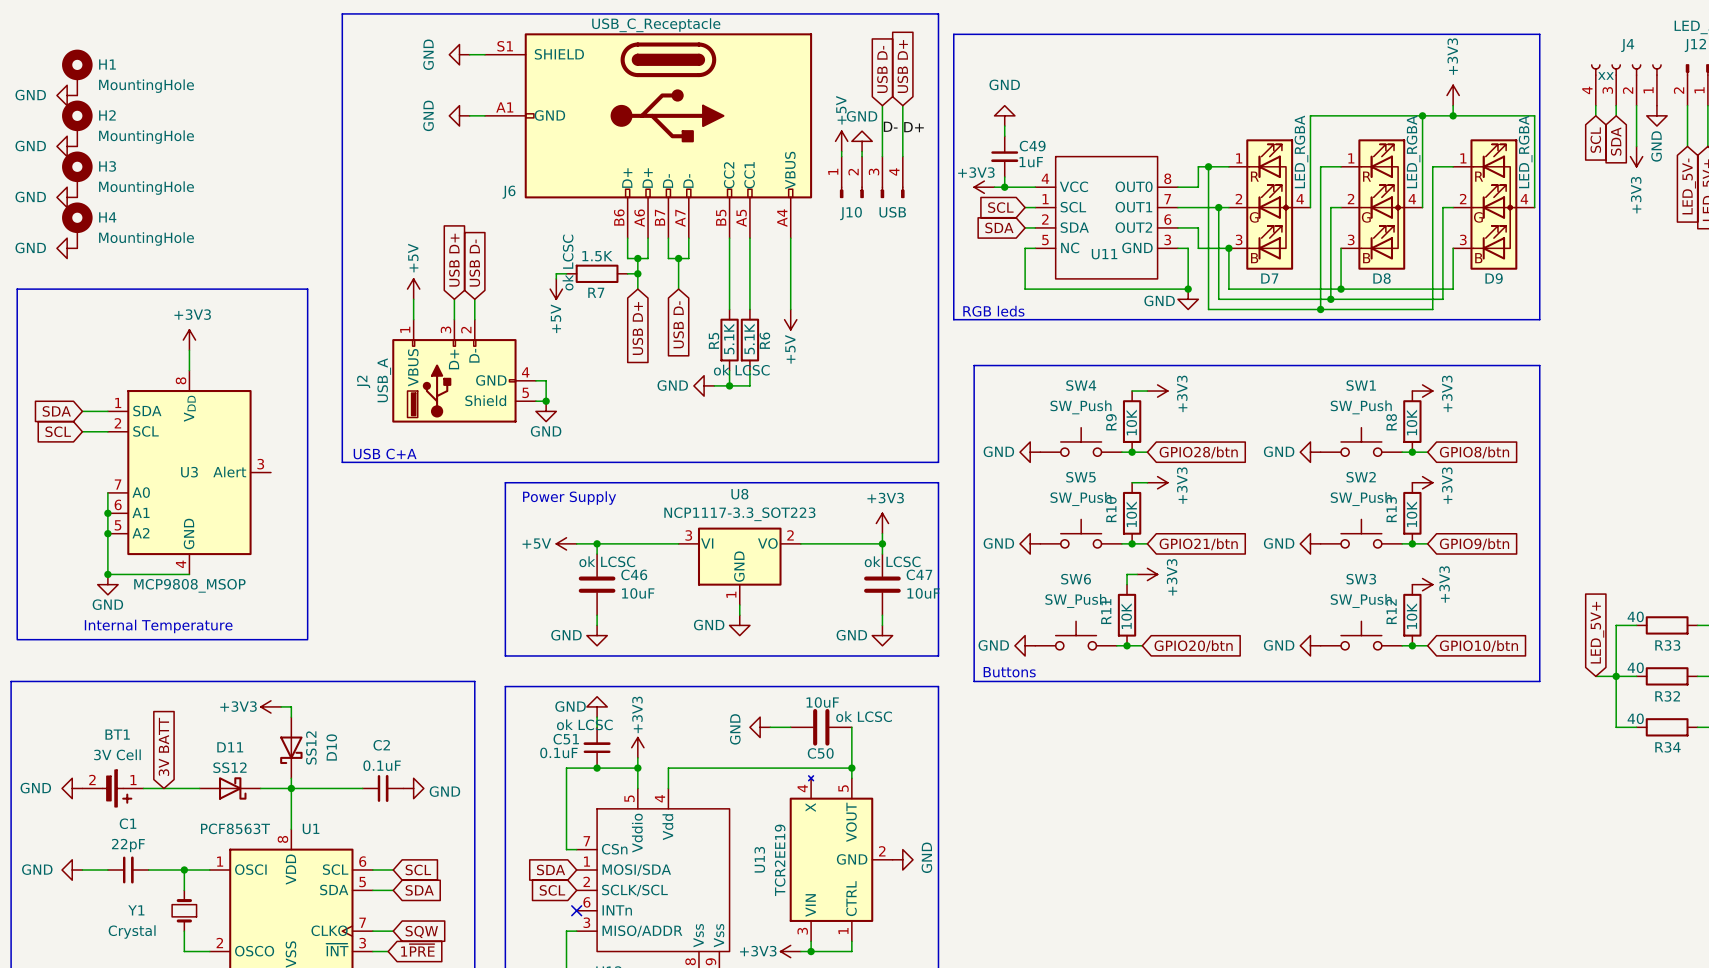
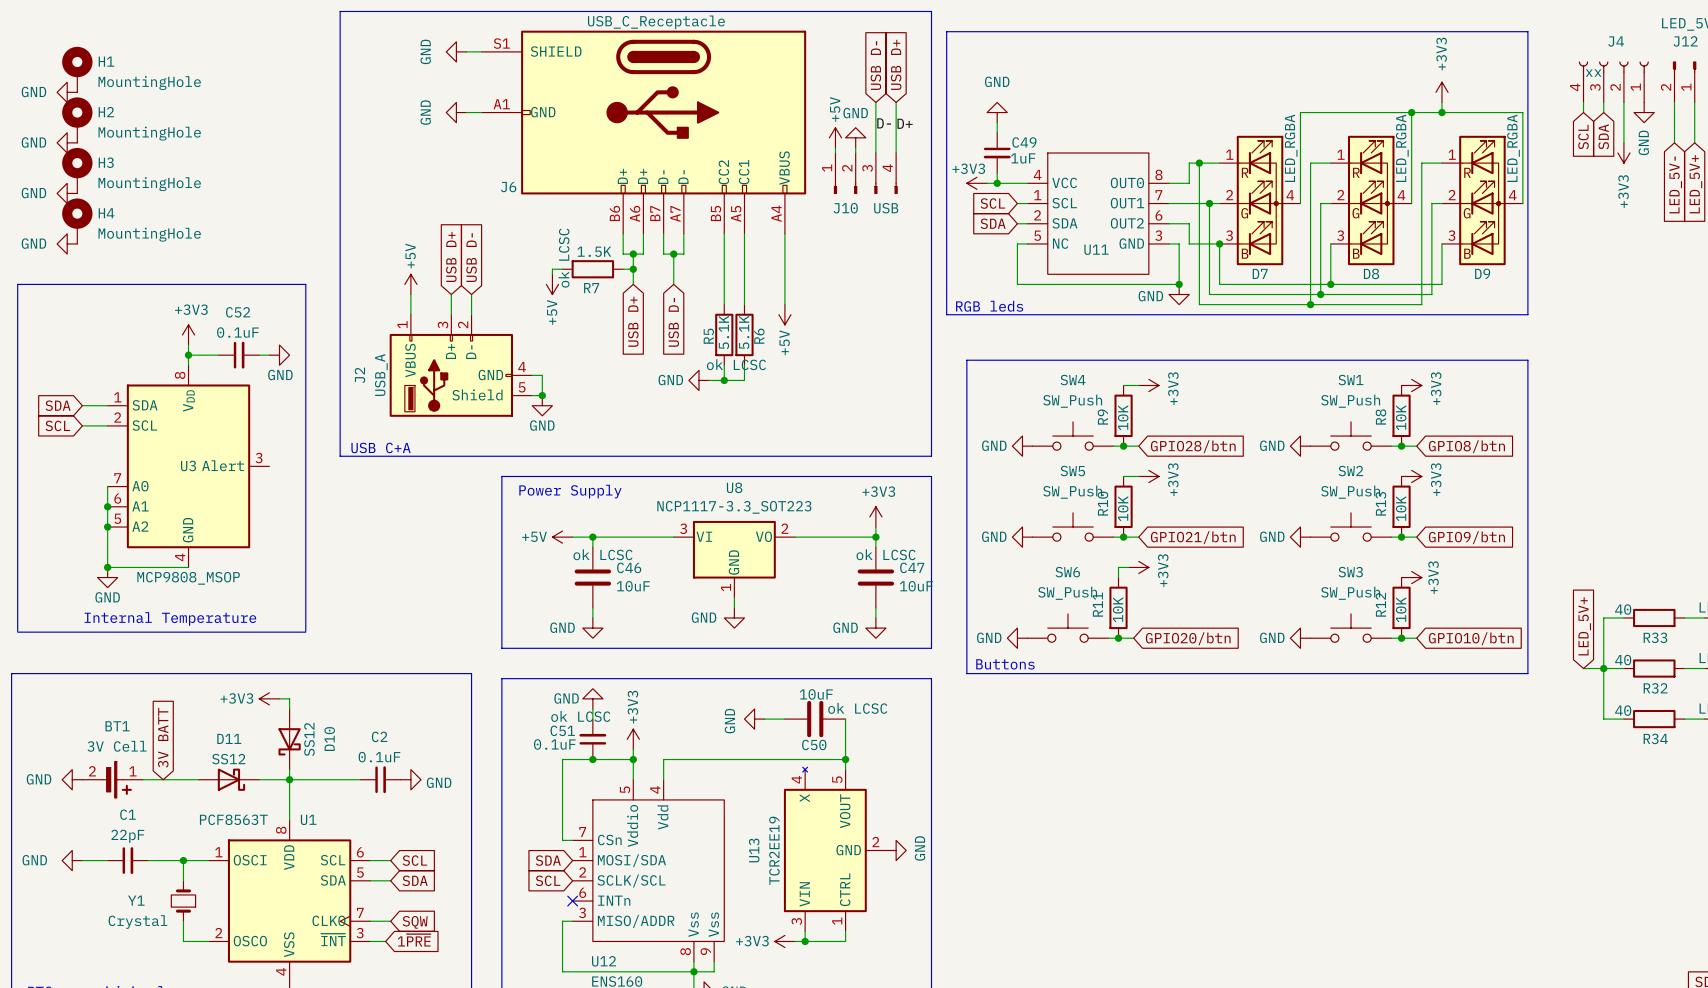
wire: none -> (188, 355) (218, 355)
junction: none -> (188, 355)
C52: none -> 0.1uF (239, 355)
wire: none -> (259, 355) (269, 355)
power symbol: none -> GND (279, 355)

